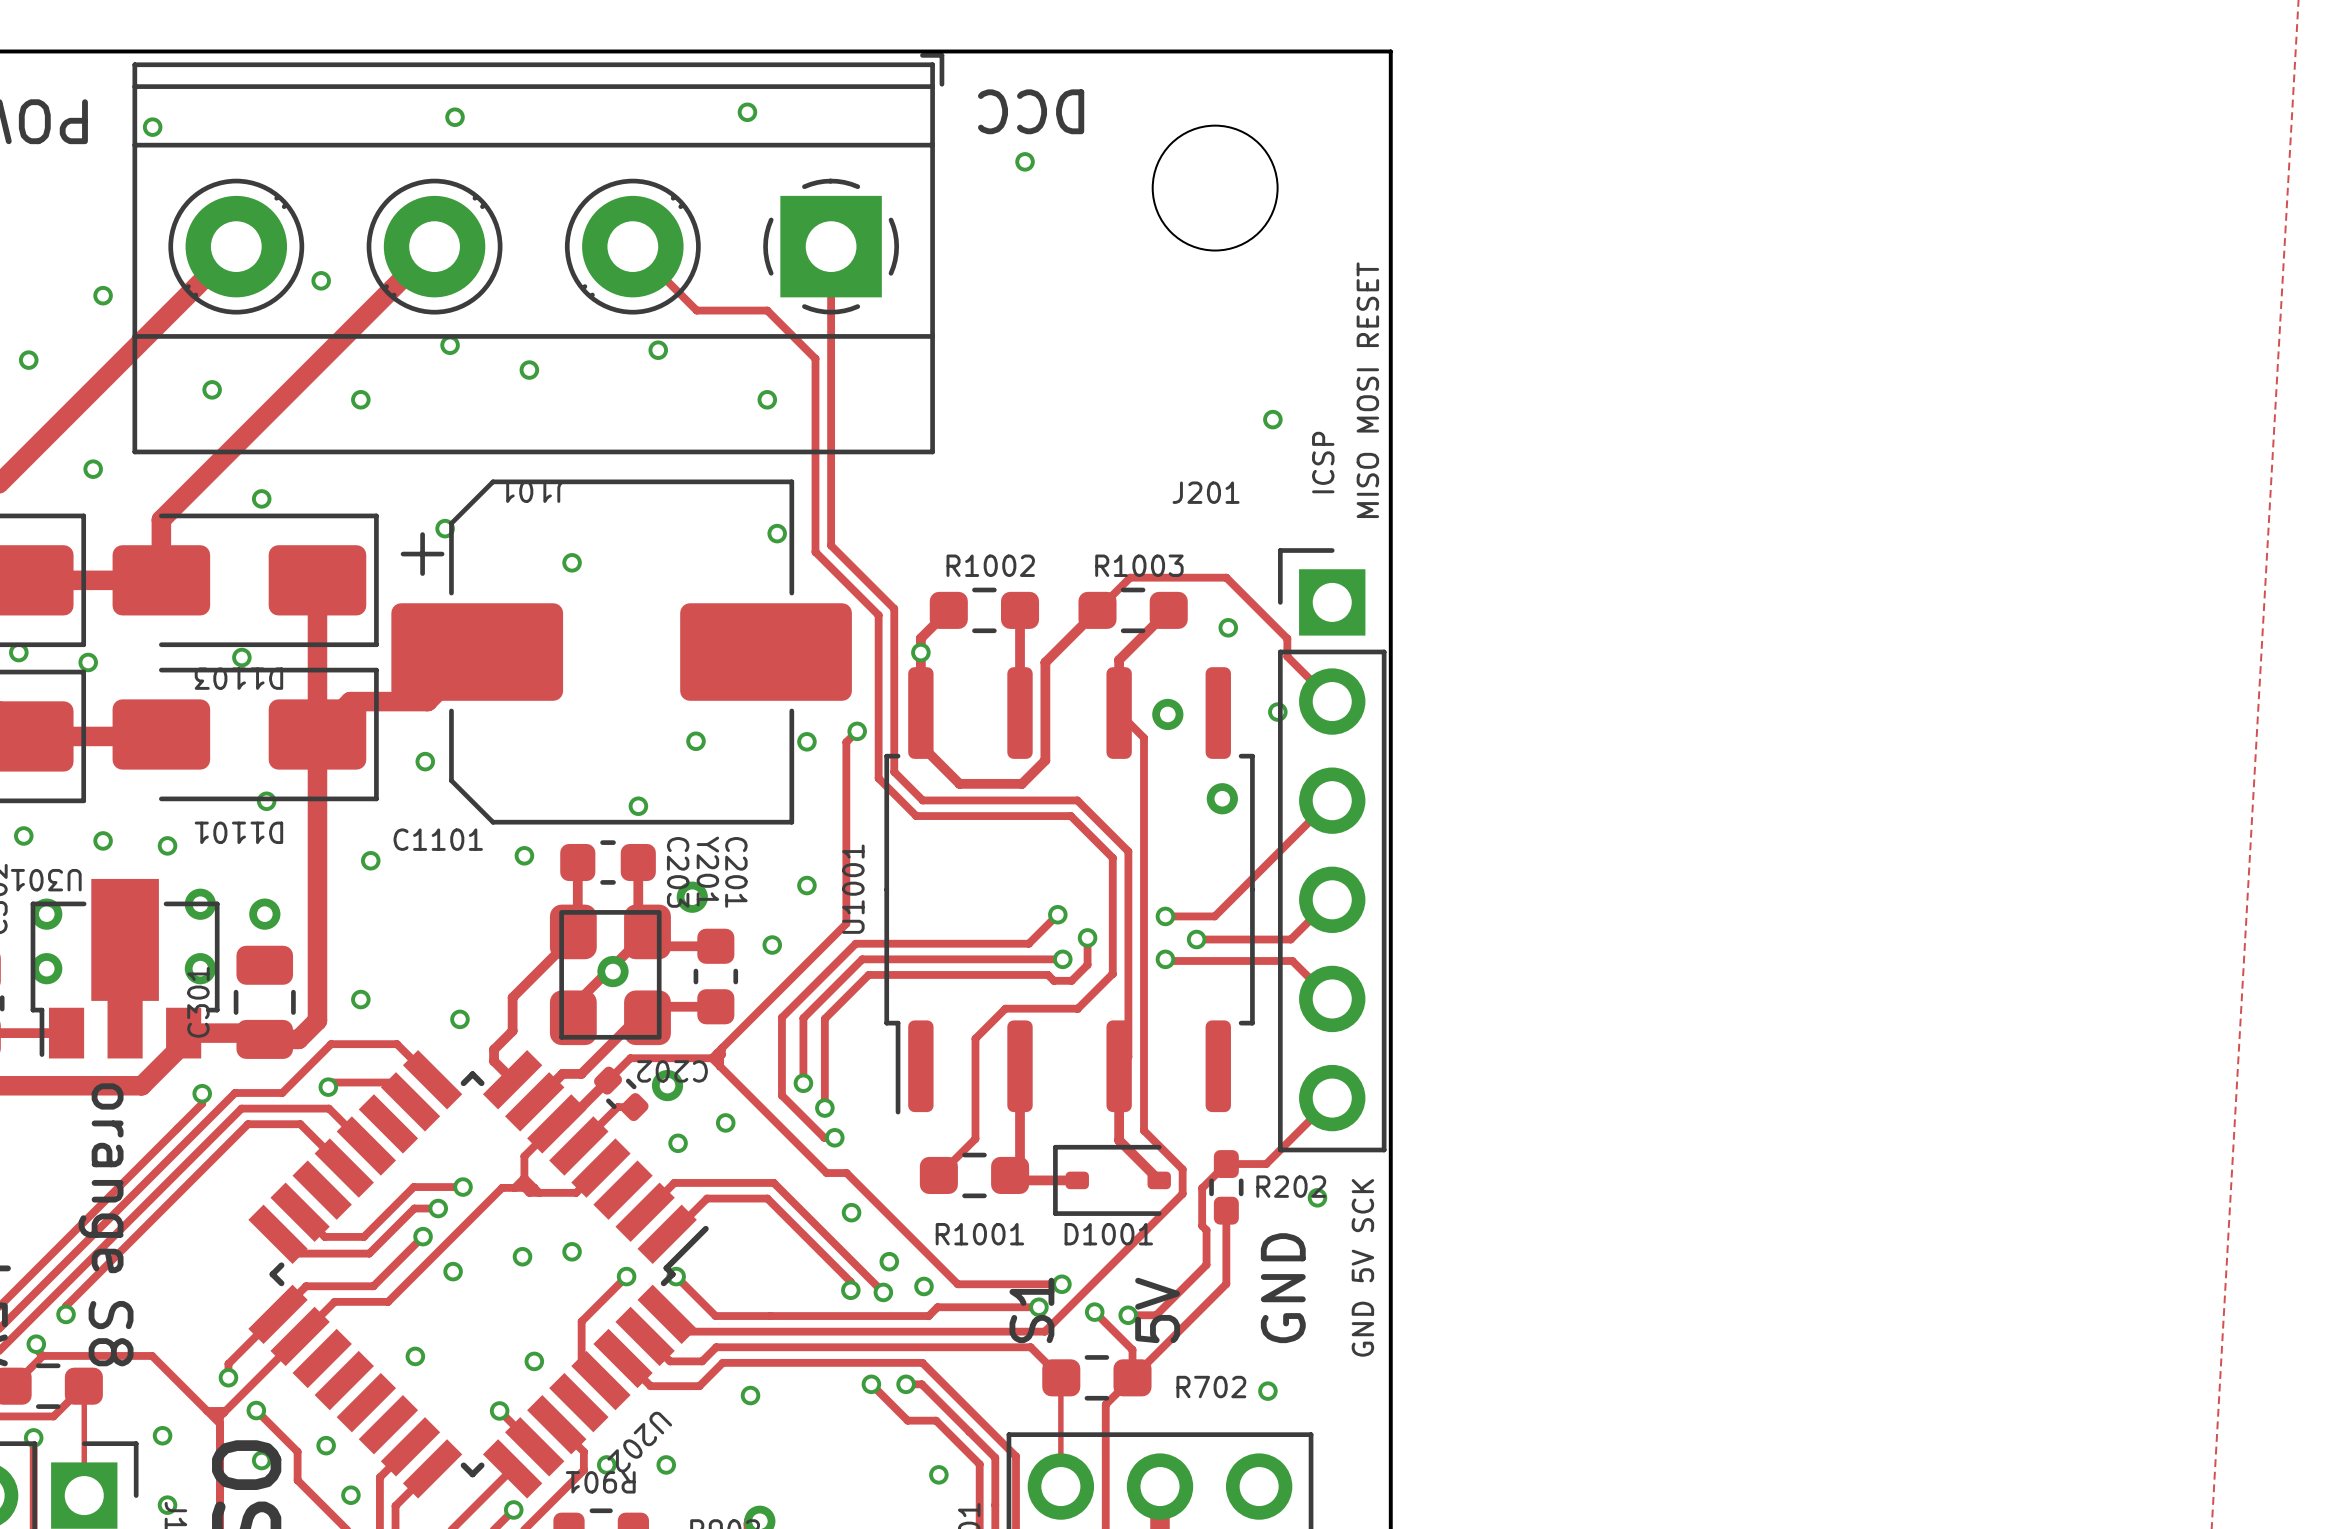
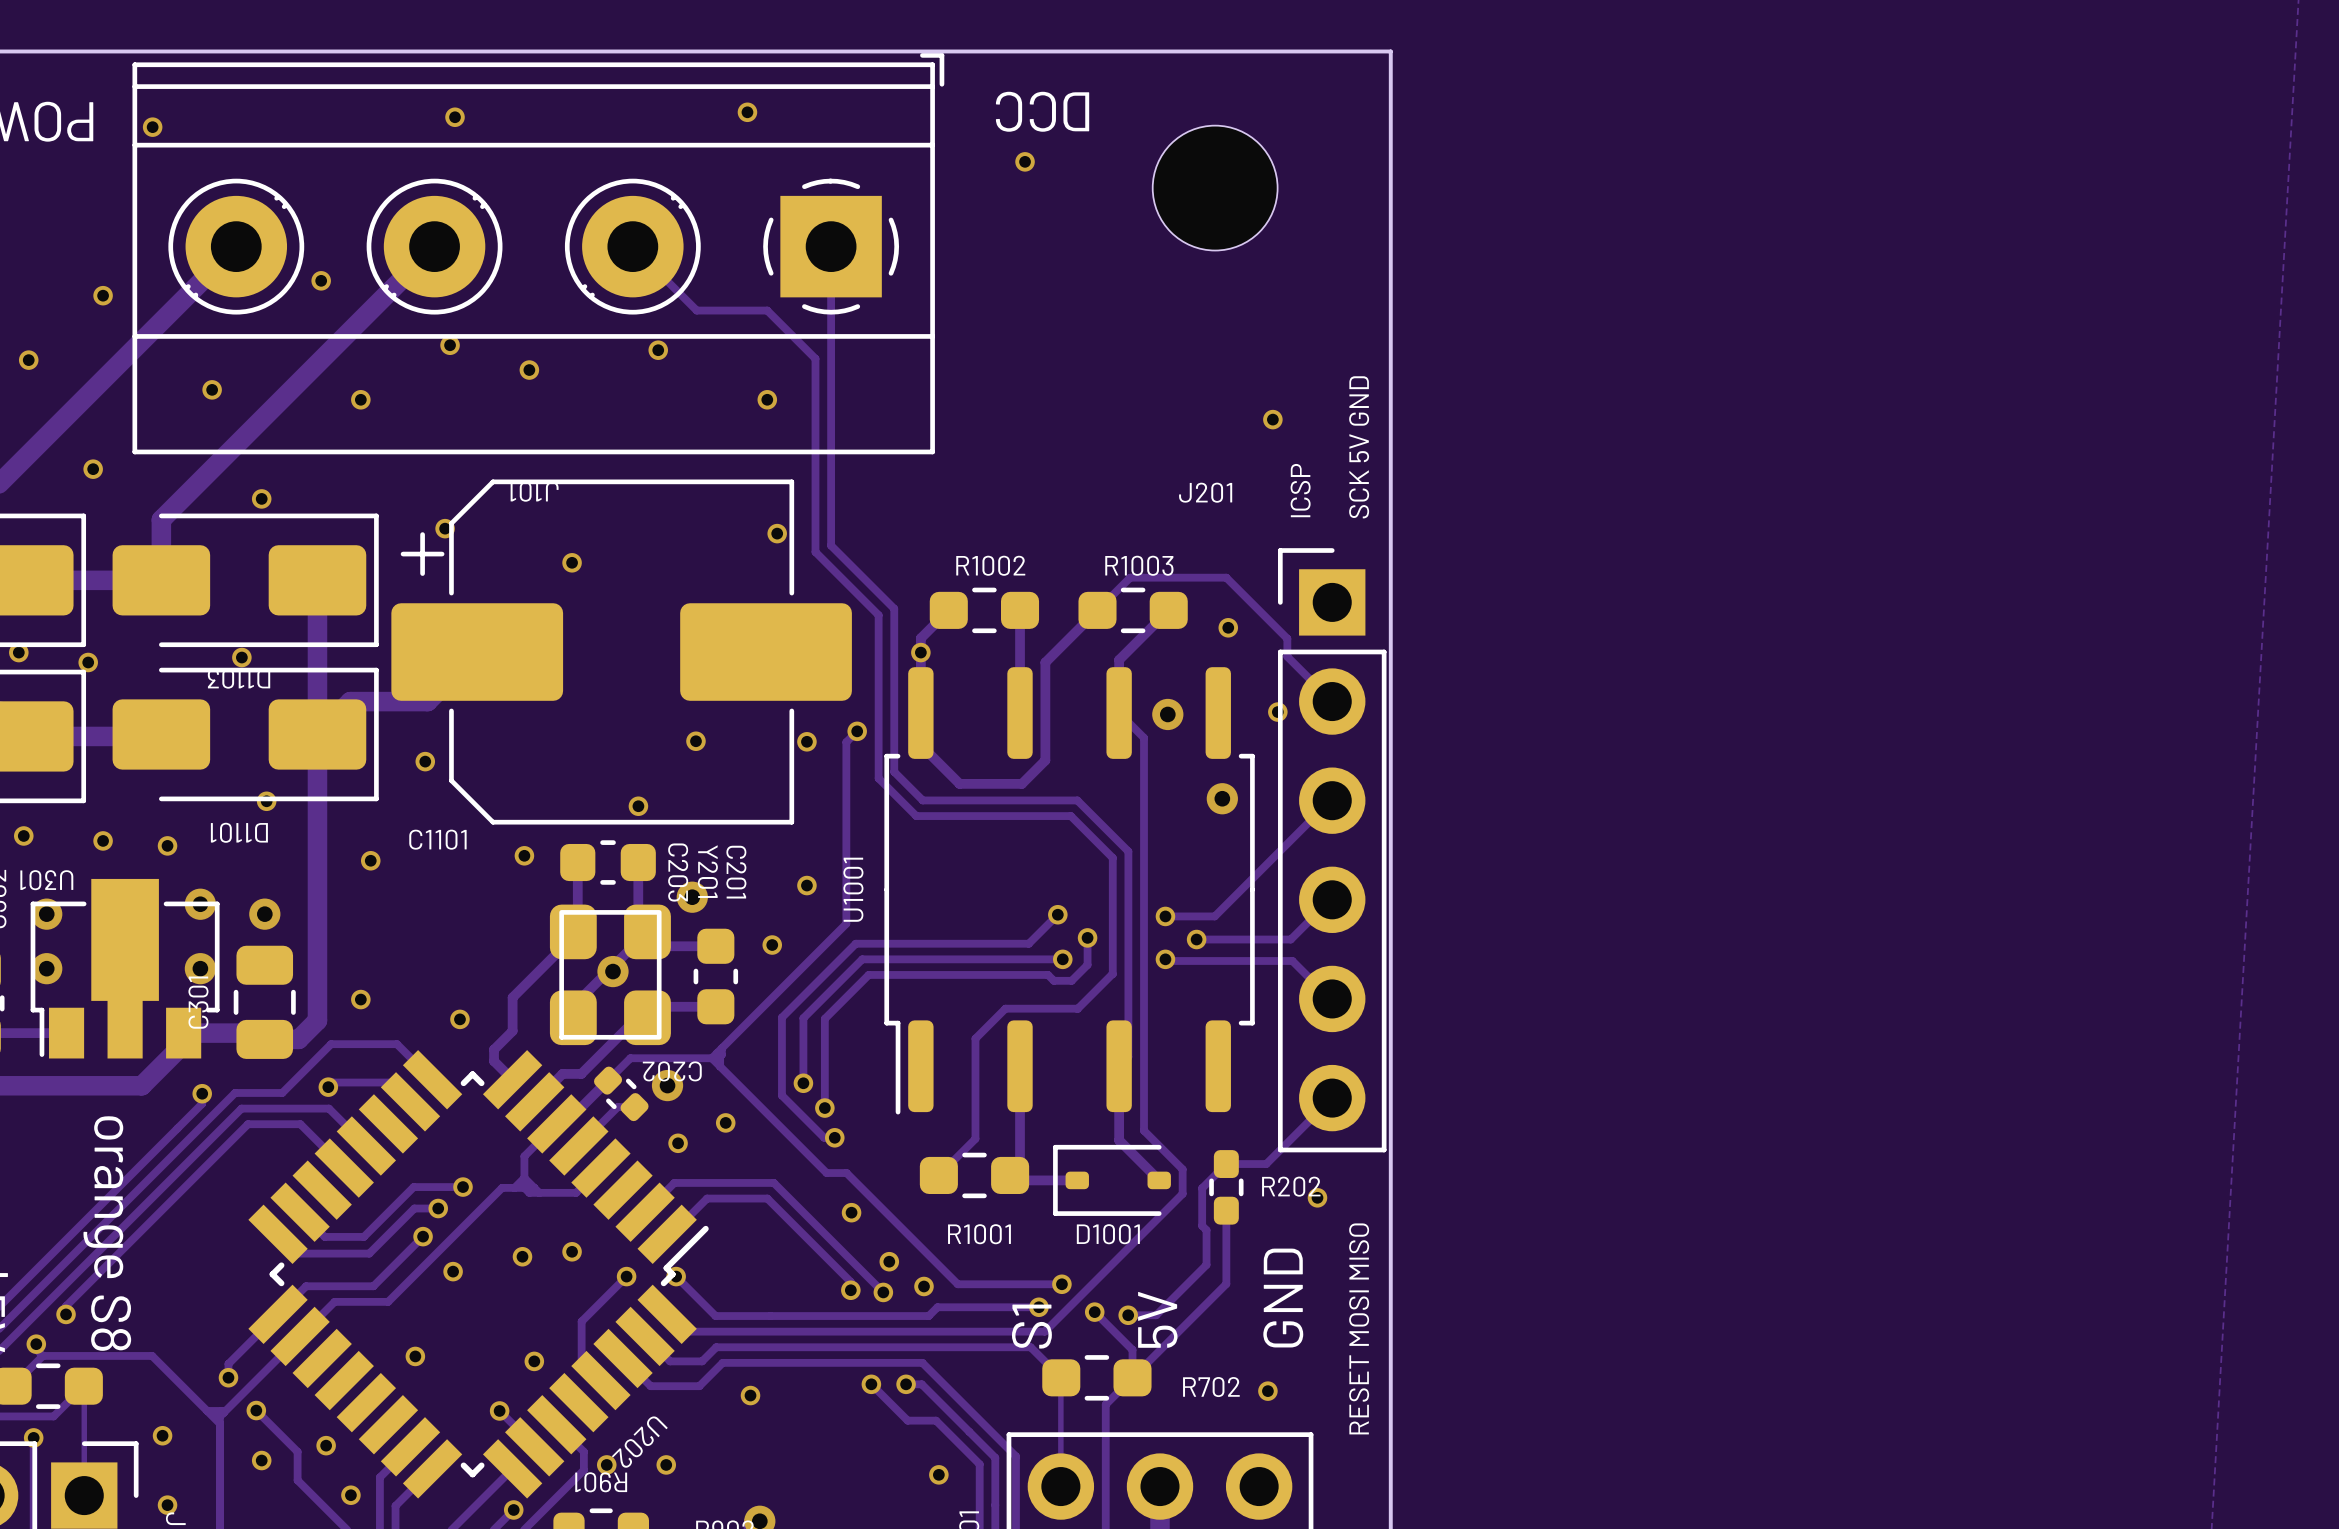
text: MISO MOSI RESET (1367, 390) -> SCK 5V GND (1359, 447)
text position: ICSP (1323, 462) -> ICSP (1300, 490)
text: GND 5V SCK (1362, 1267) -> none
text: none -> RESET MOSI MISO (1359, 1328)

